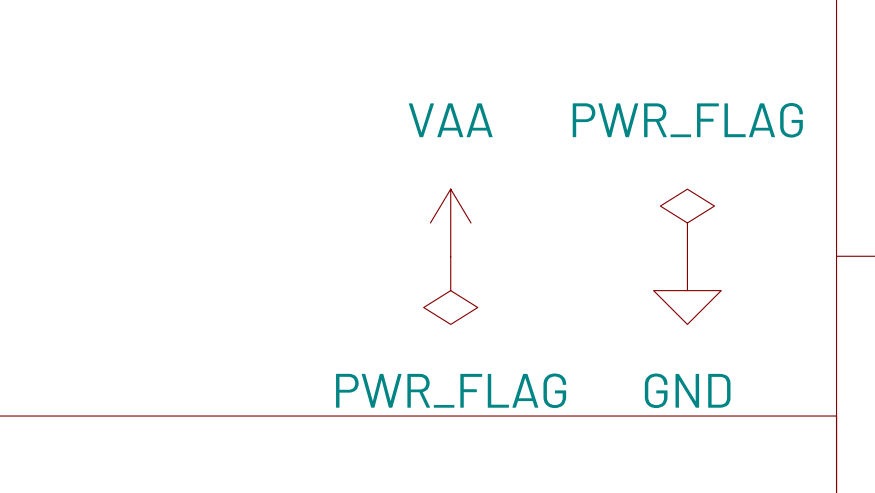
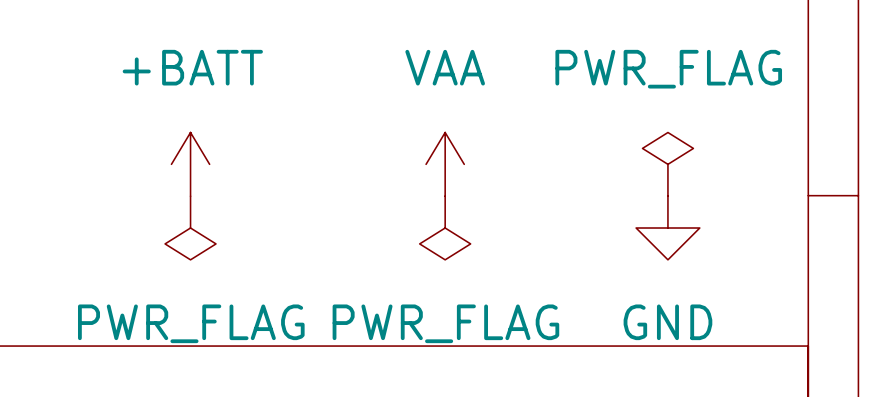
power symbol: none -> +BATT (190, 164)
power symbol: none -> PWR_FLAG (190, 228)

